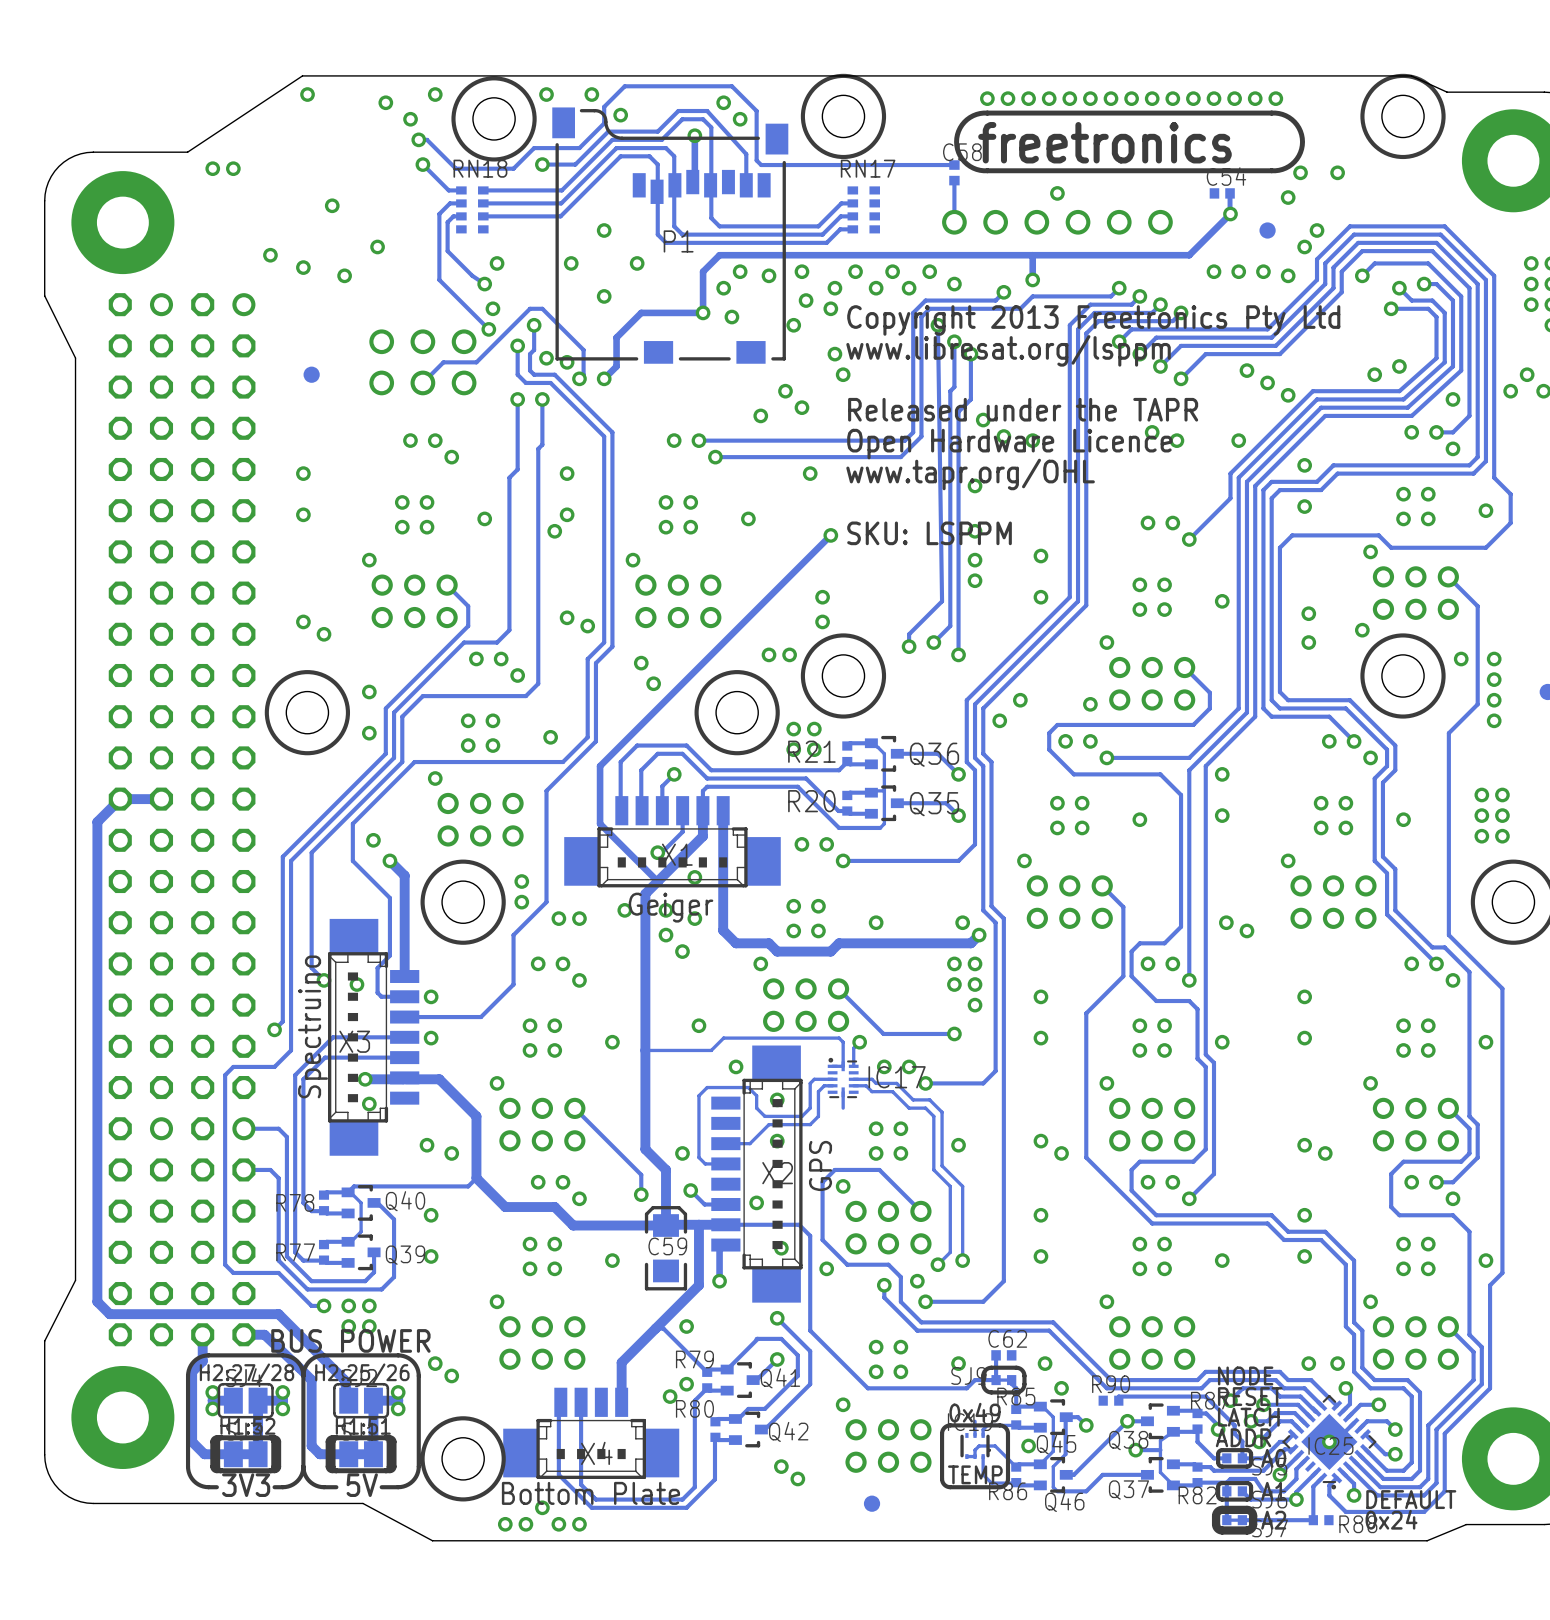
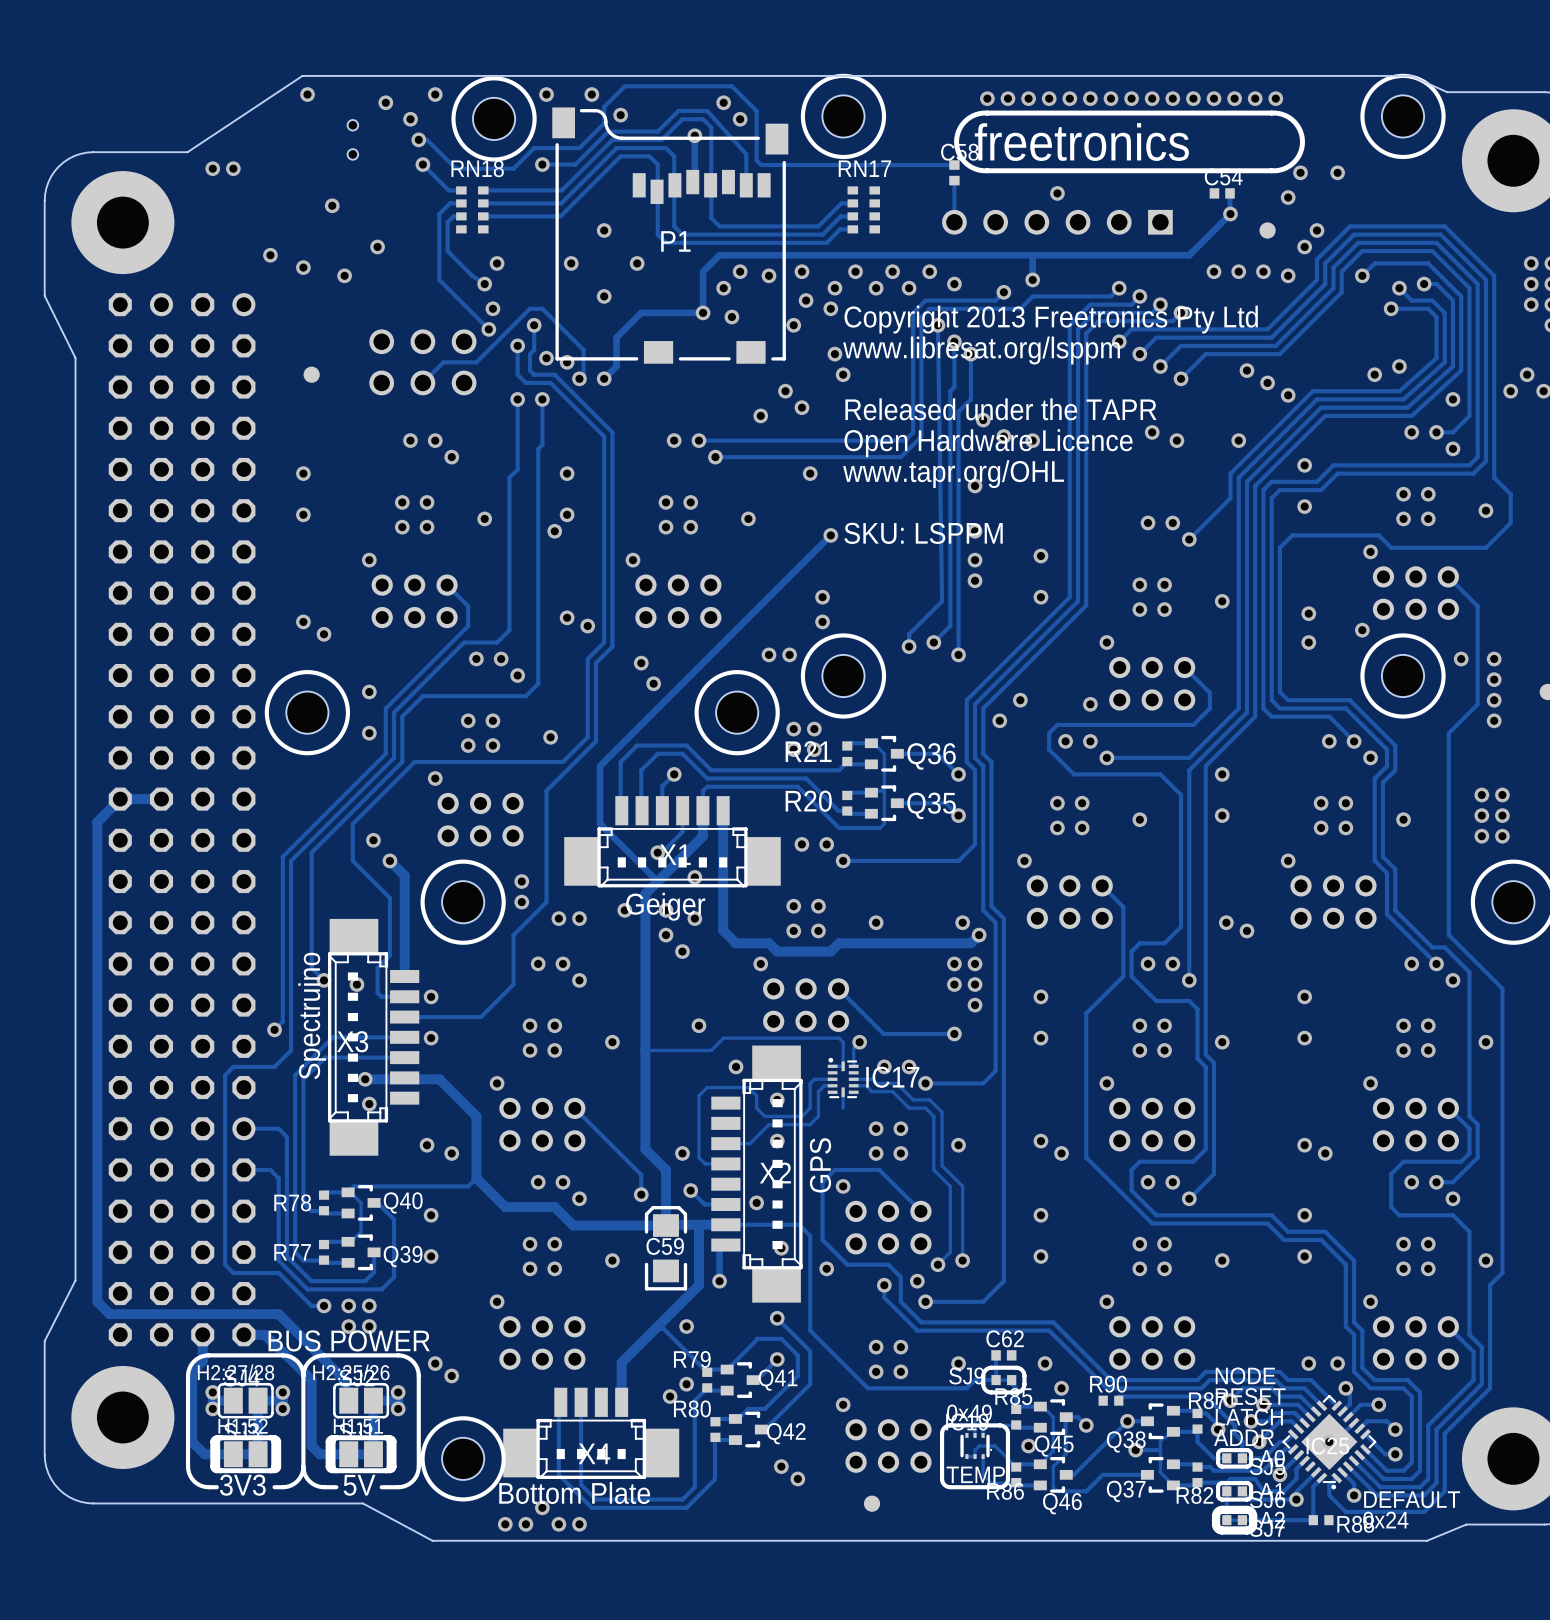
part: none -> (352, 139)
part footprint: [942, 209, 1173, 235] -> [942, 209, 1173, 235]

